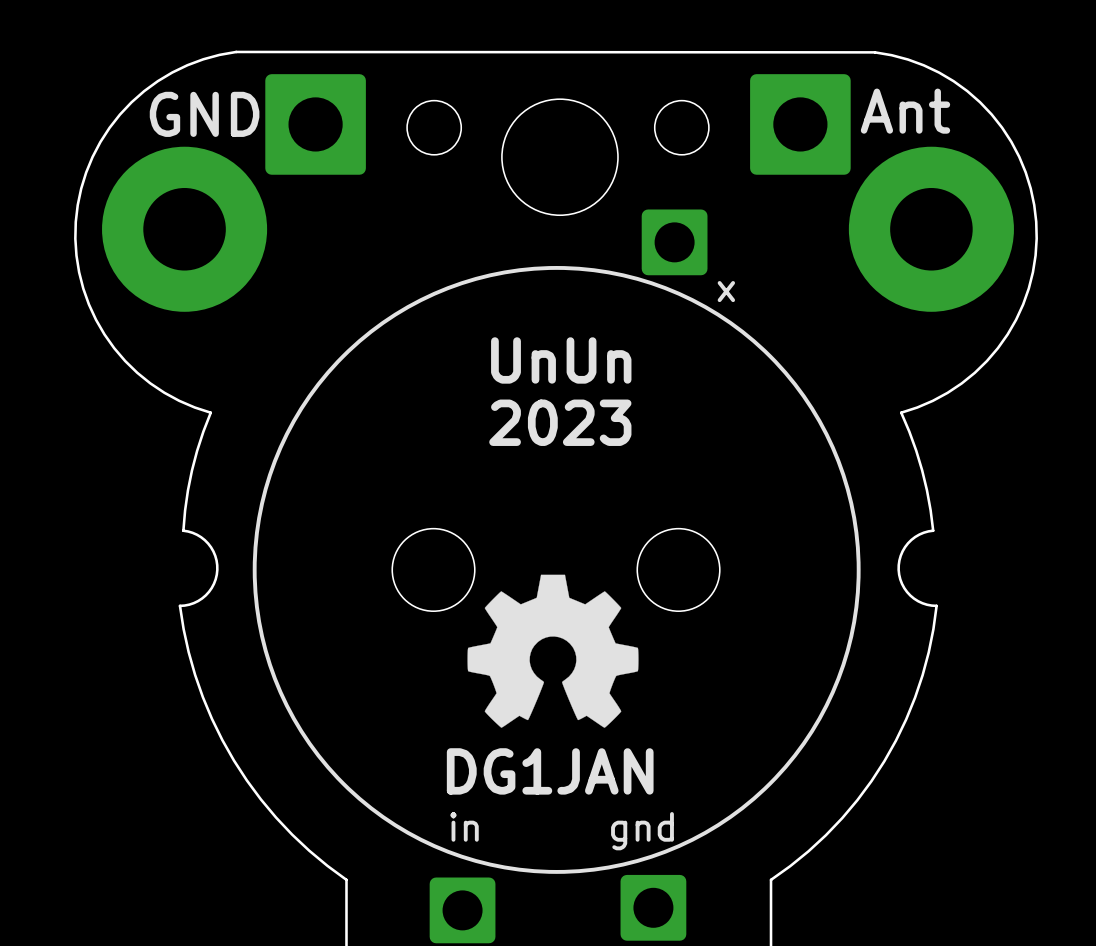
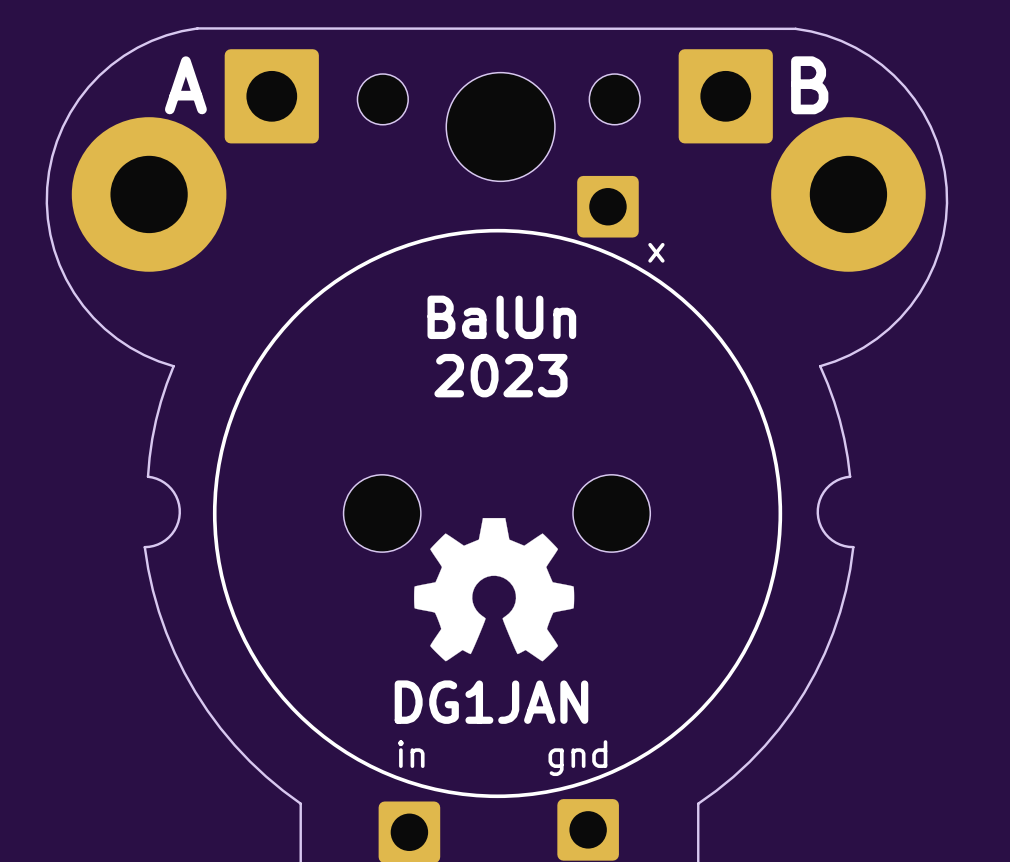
text: Ant (905, 111) -> B (809, 85)
text: GND (204, 114) -> A (185, 85)
text: UnUn (561, 360) -> BalUn (501, 317)

